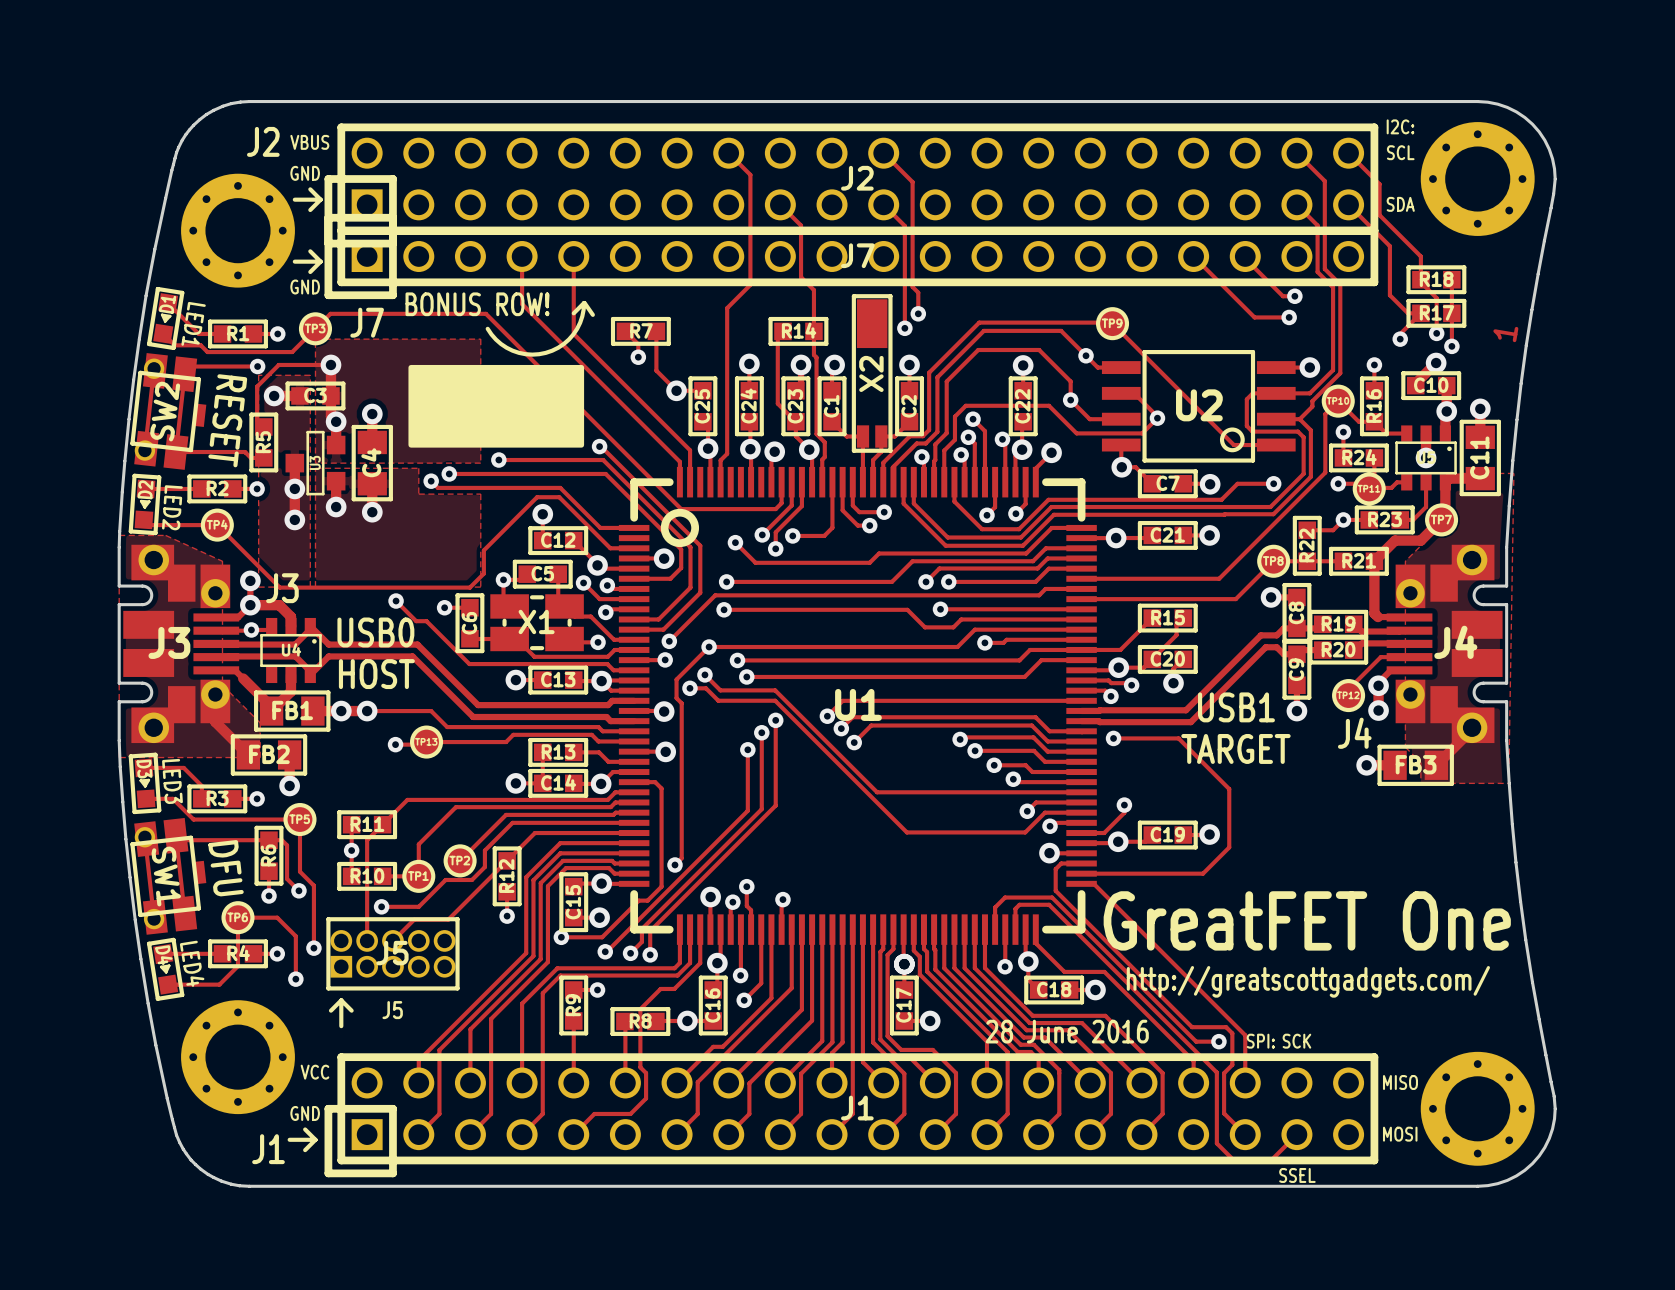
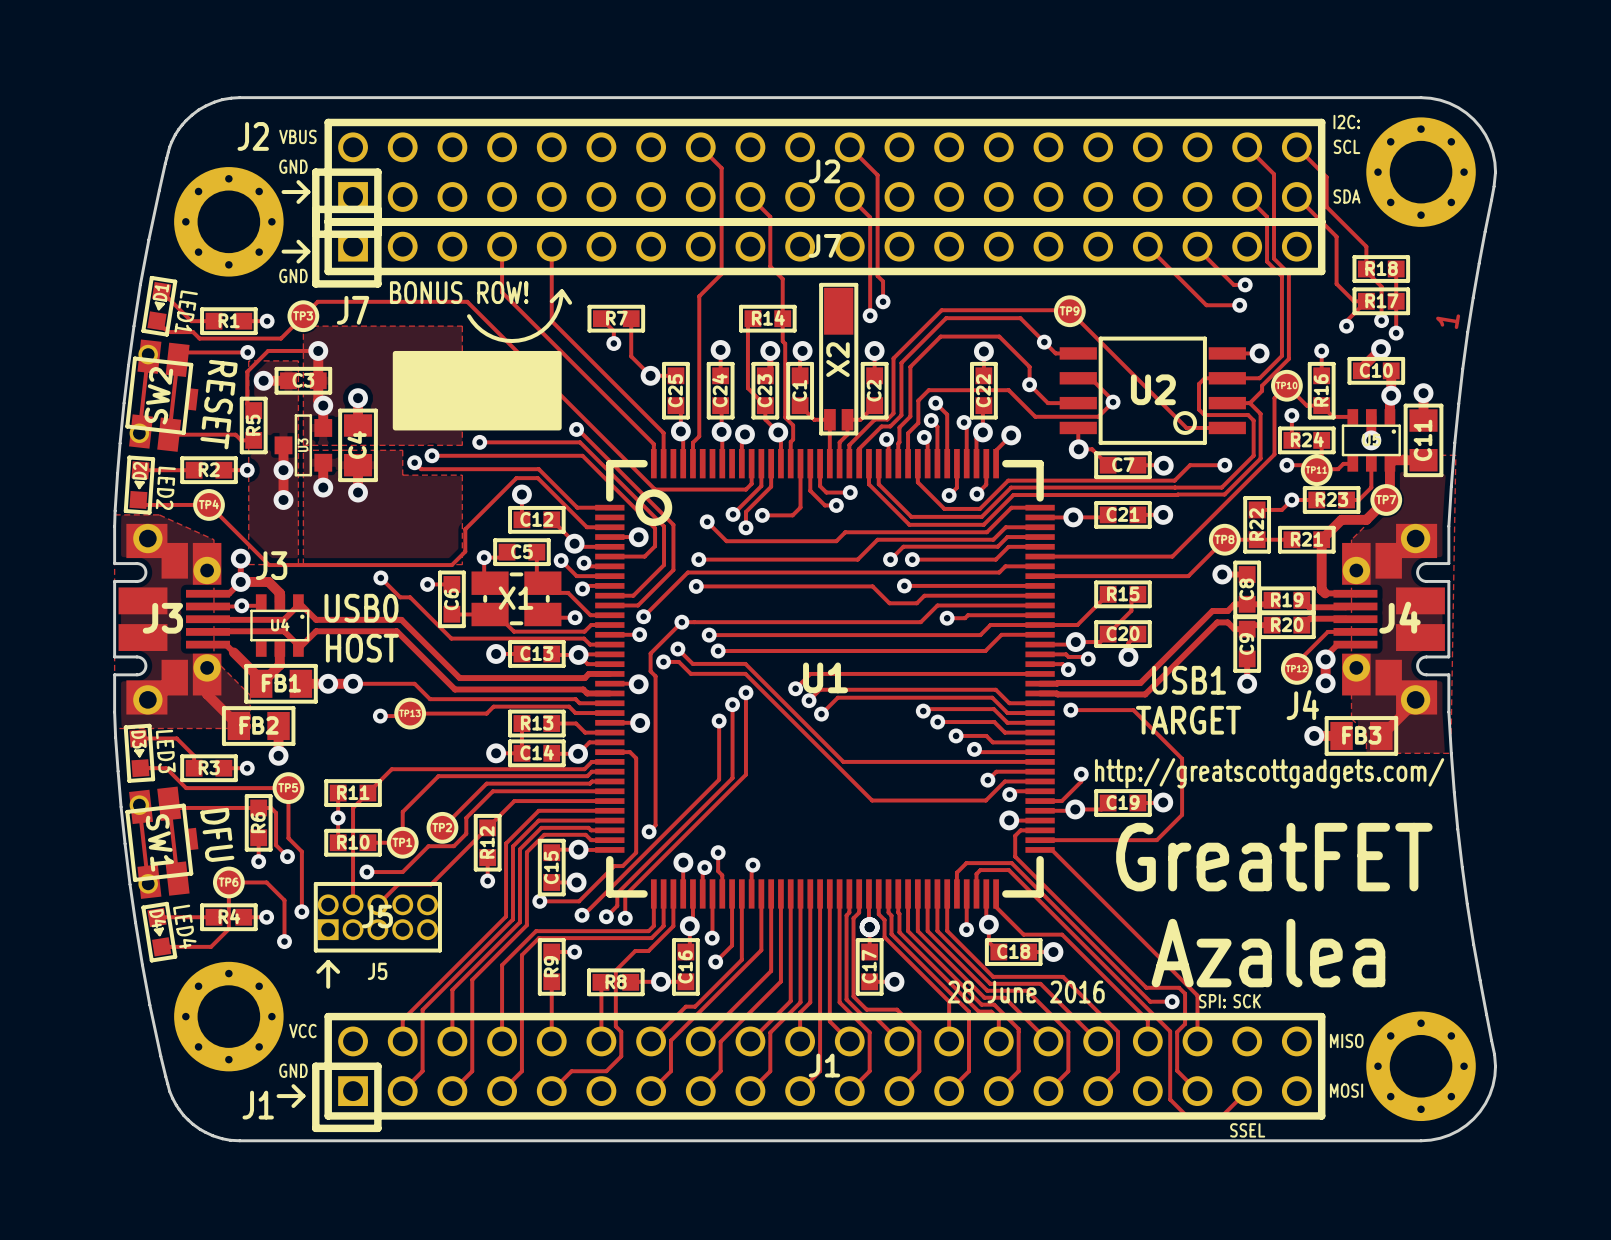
text: GreatFET One (1307, 920) -> GreatFET (1274, 857)
text position: http://greatscottgadgets.com/ (1308, 981) -> http://greatscottgadgets.com/ (1269, 773)
text: none -> Azalea (1268, 953)

